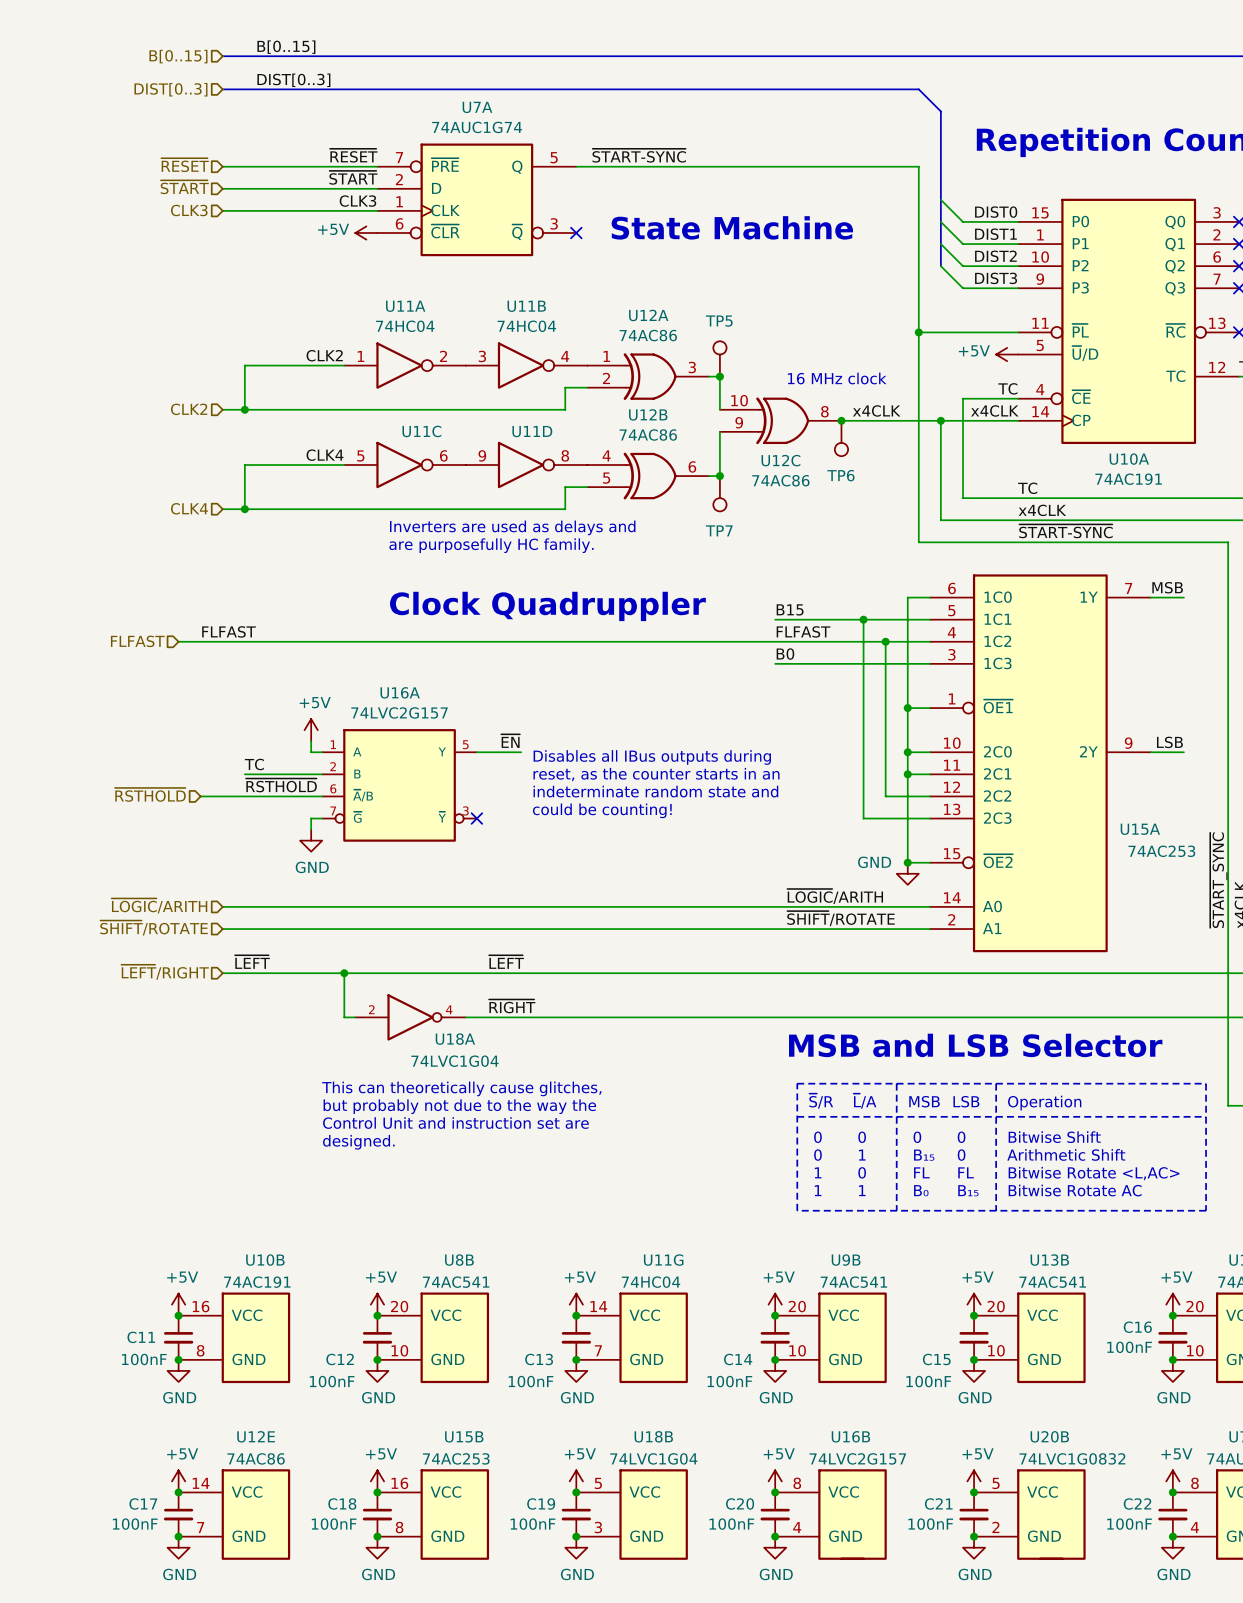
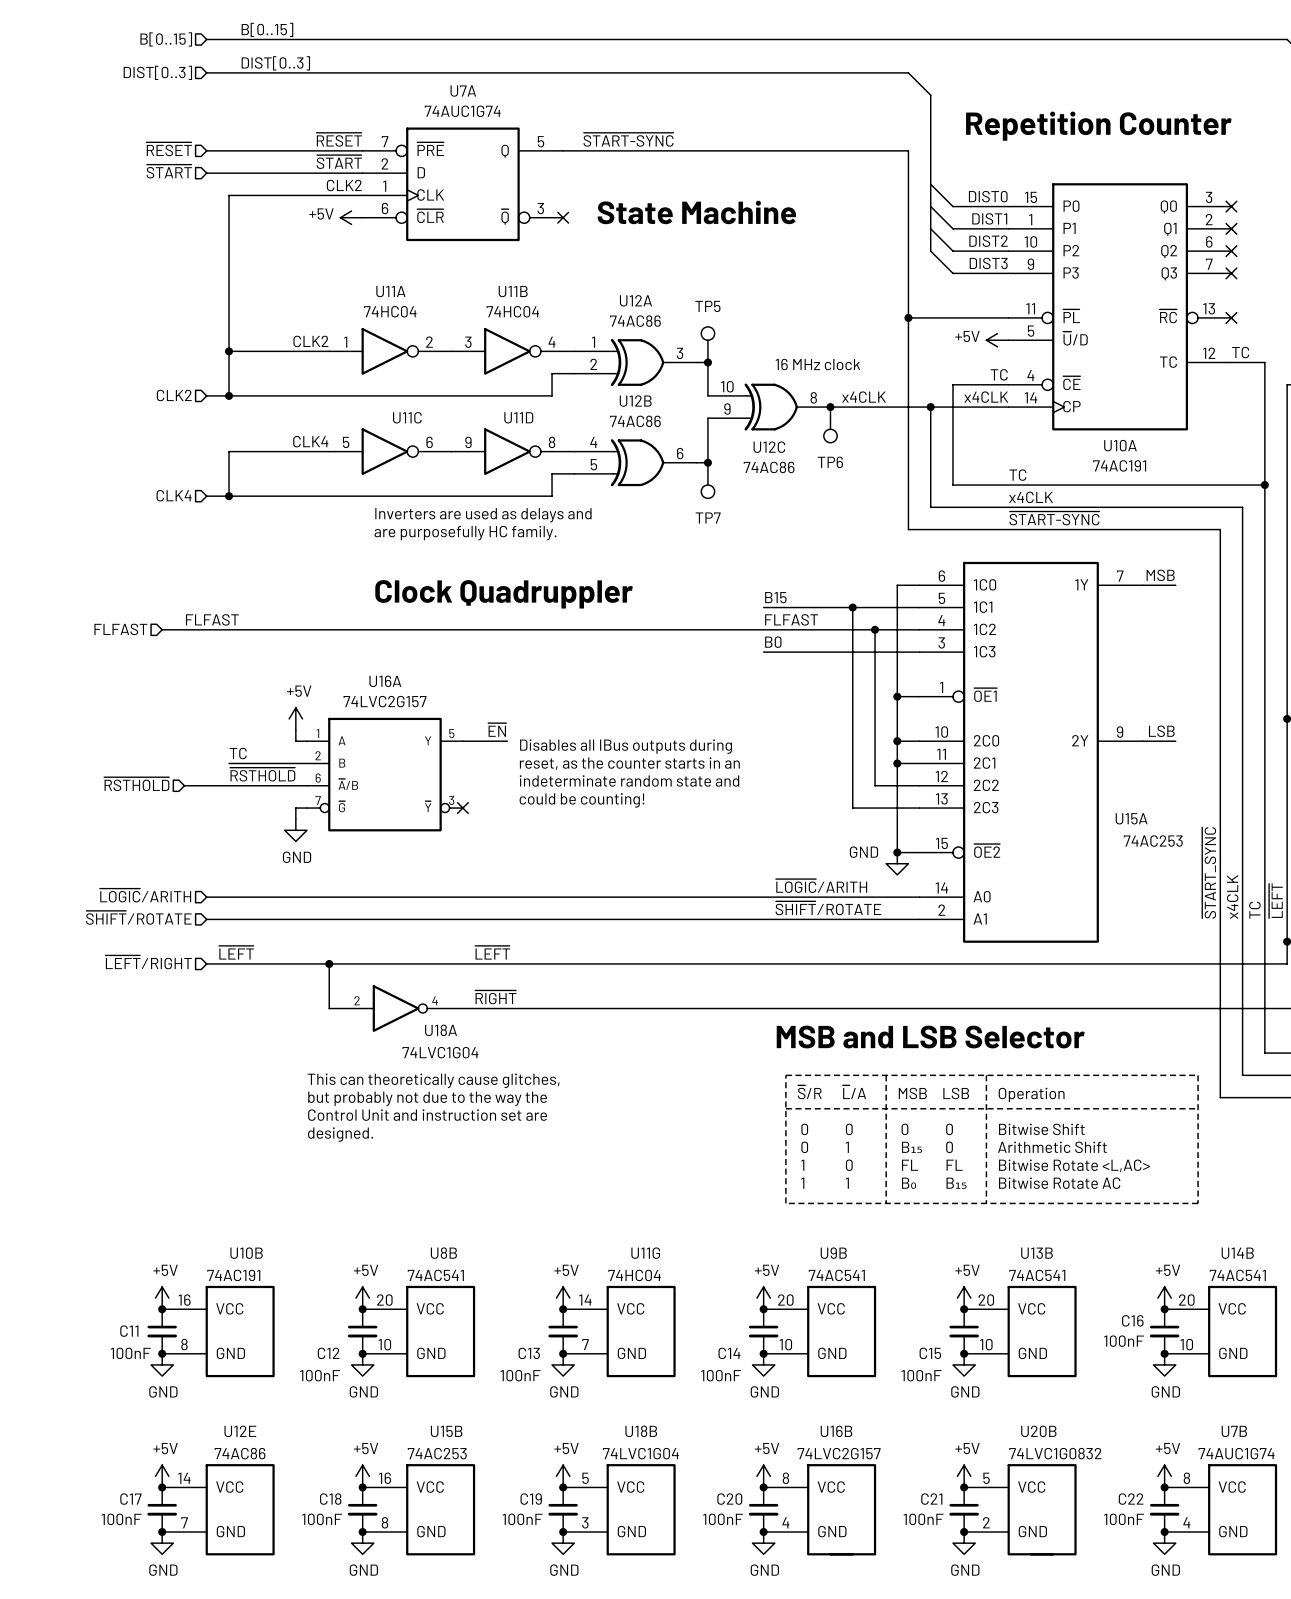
label: CLK3 (357, 201) -> CLK2 (344, 185)
hierarchical label: CLK3 (189, 210) -> none
wire: (222, 210) (244, 210) -> (229, 351) (229, 195)
junction: none -> (229, 351)

